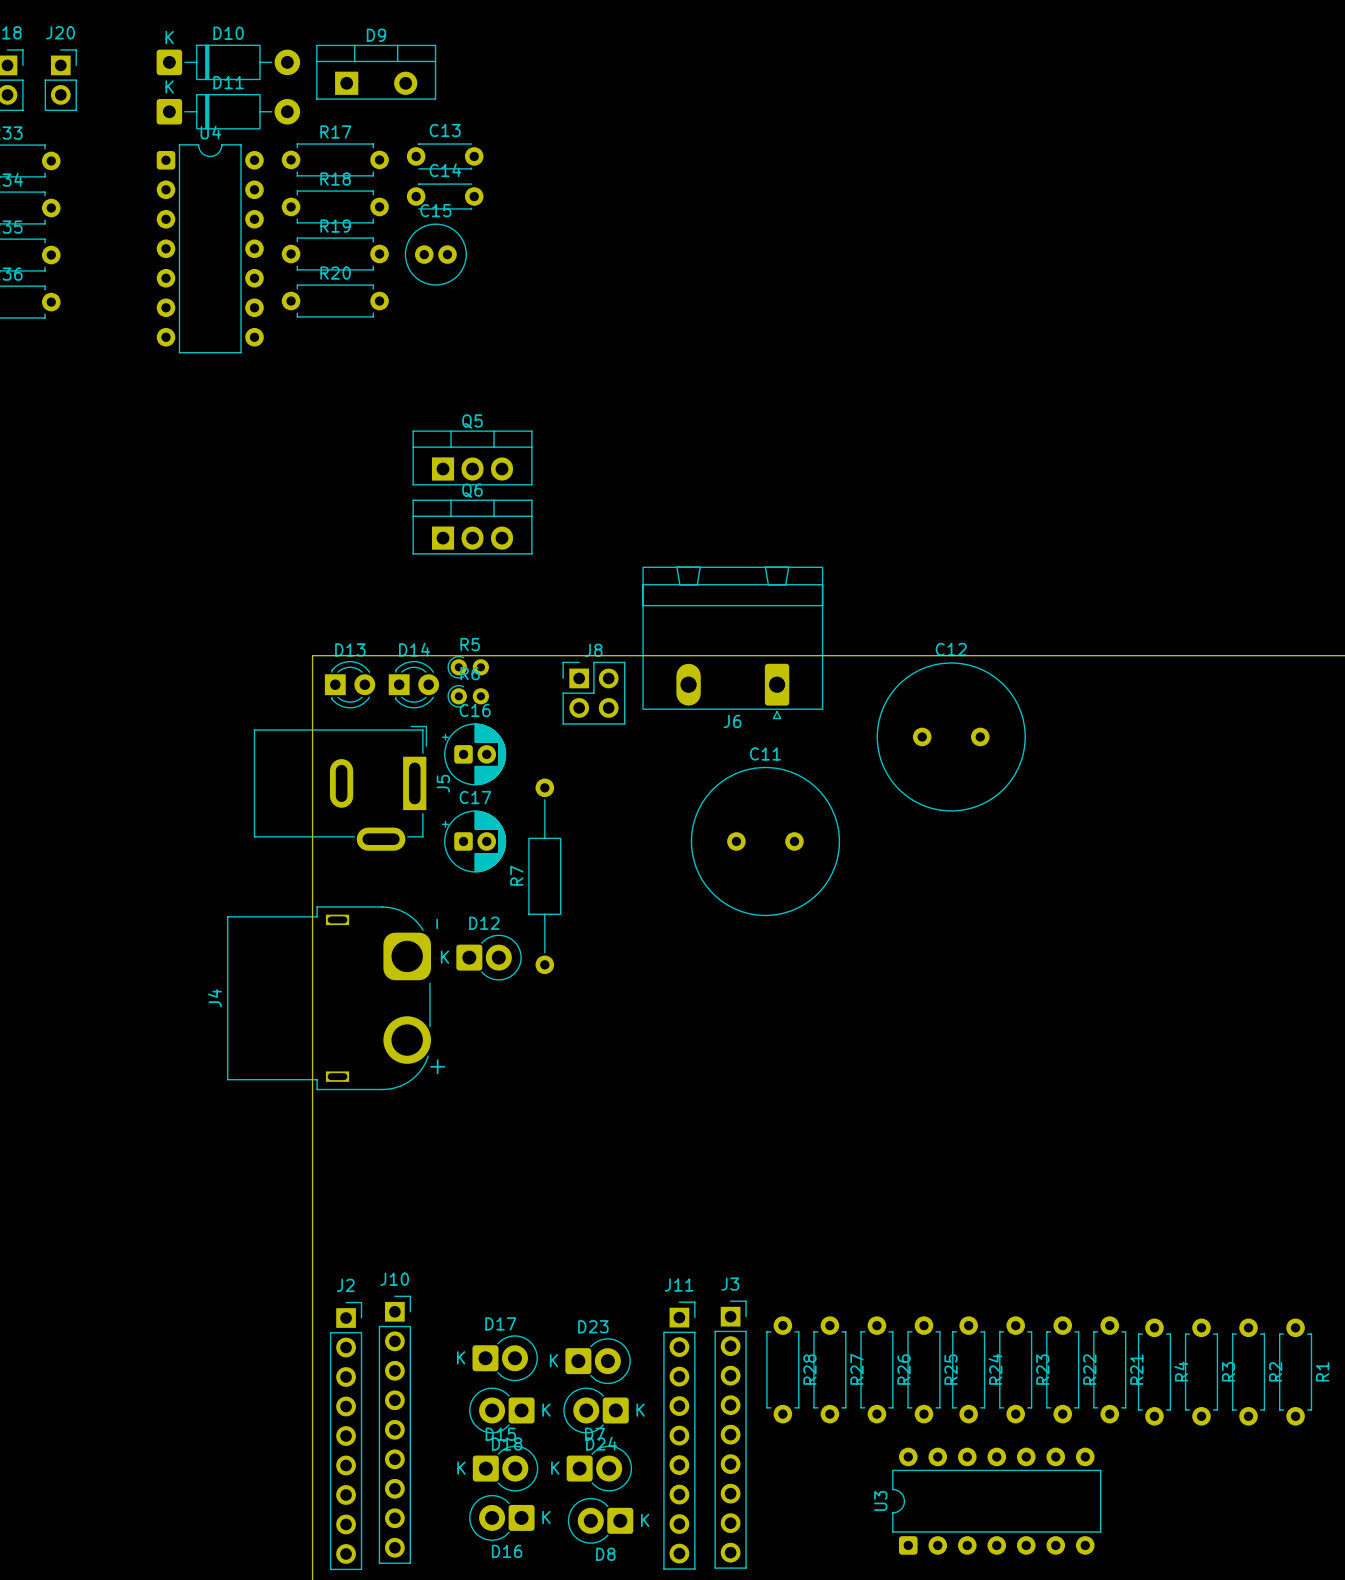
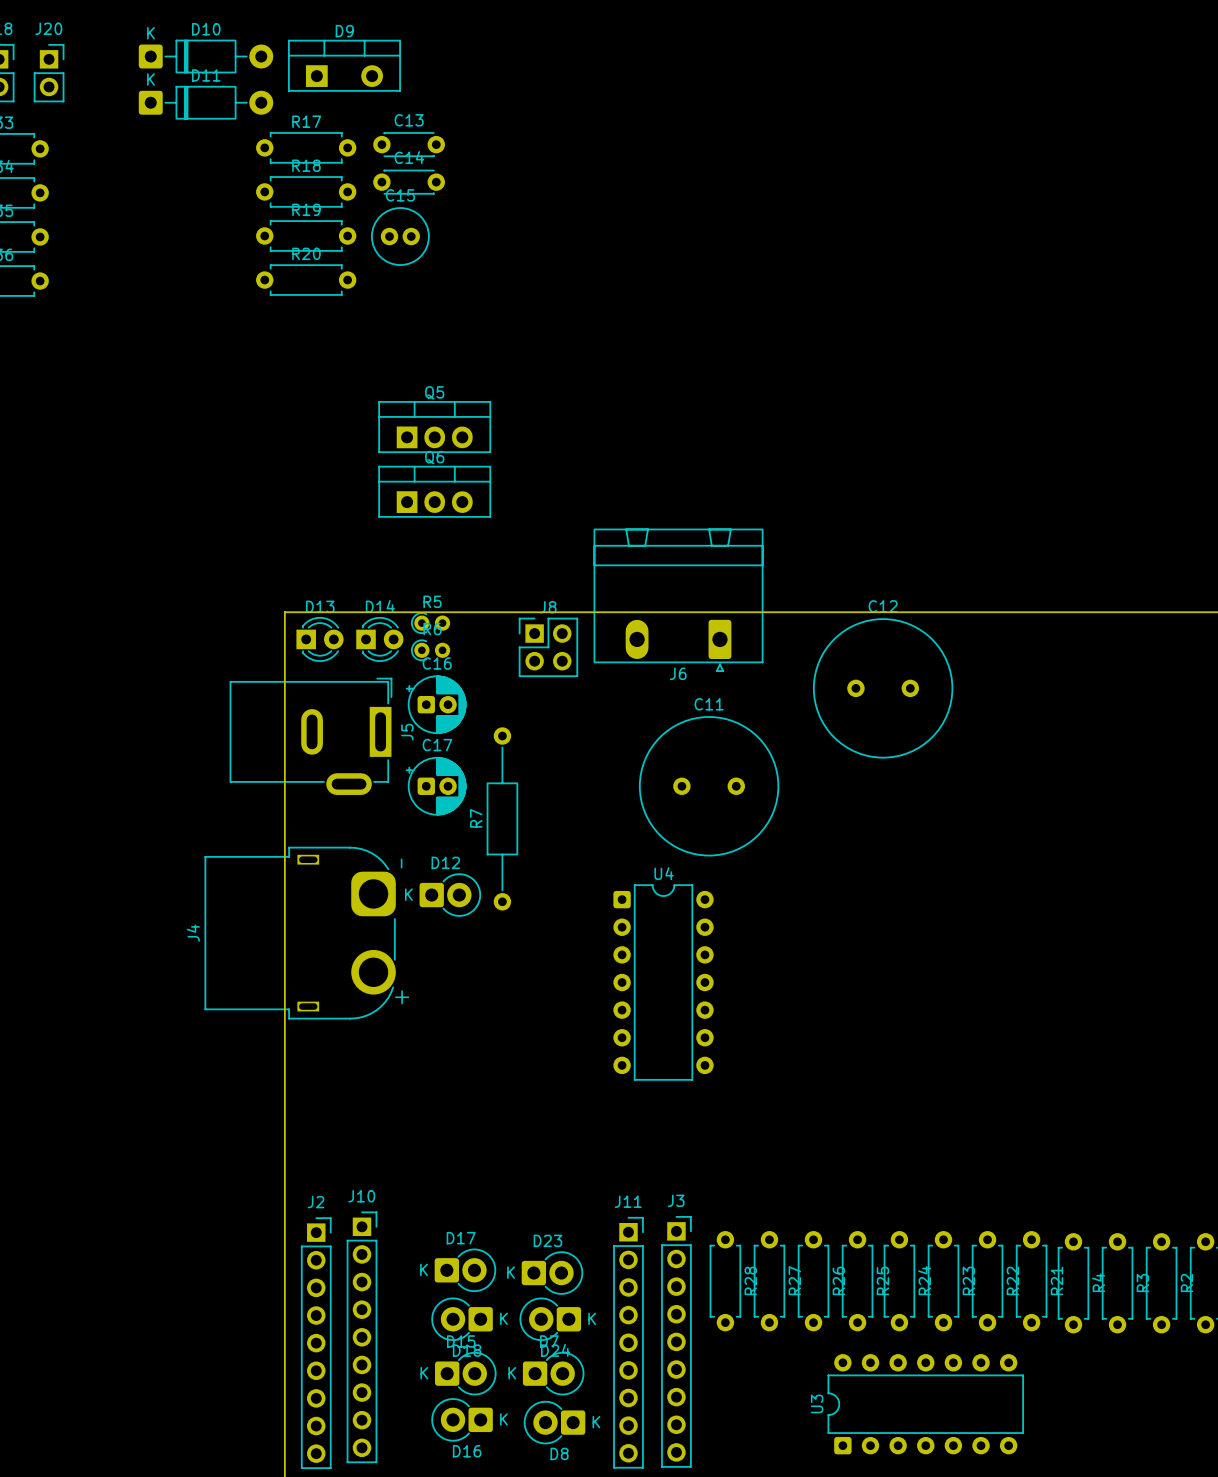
U4 position: (210, 248) -> (663, 982)

